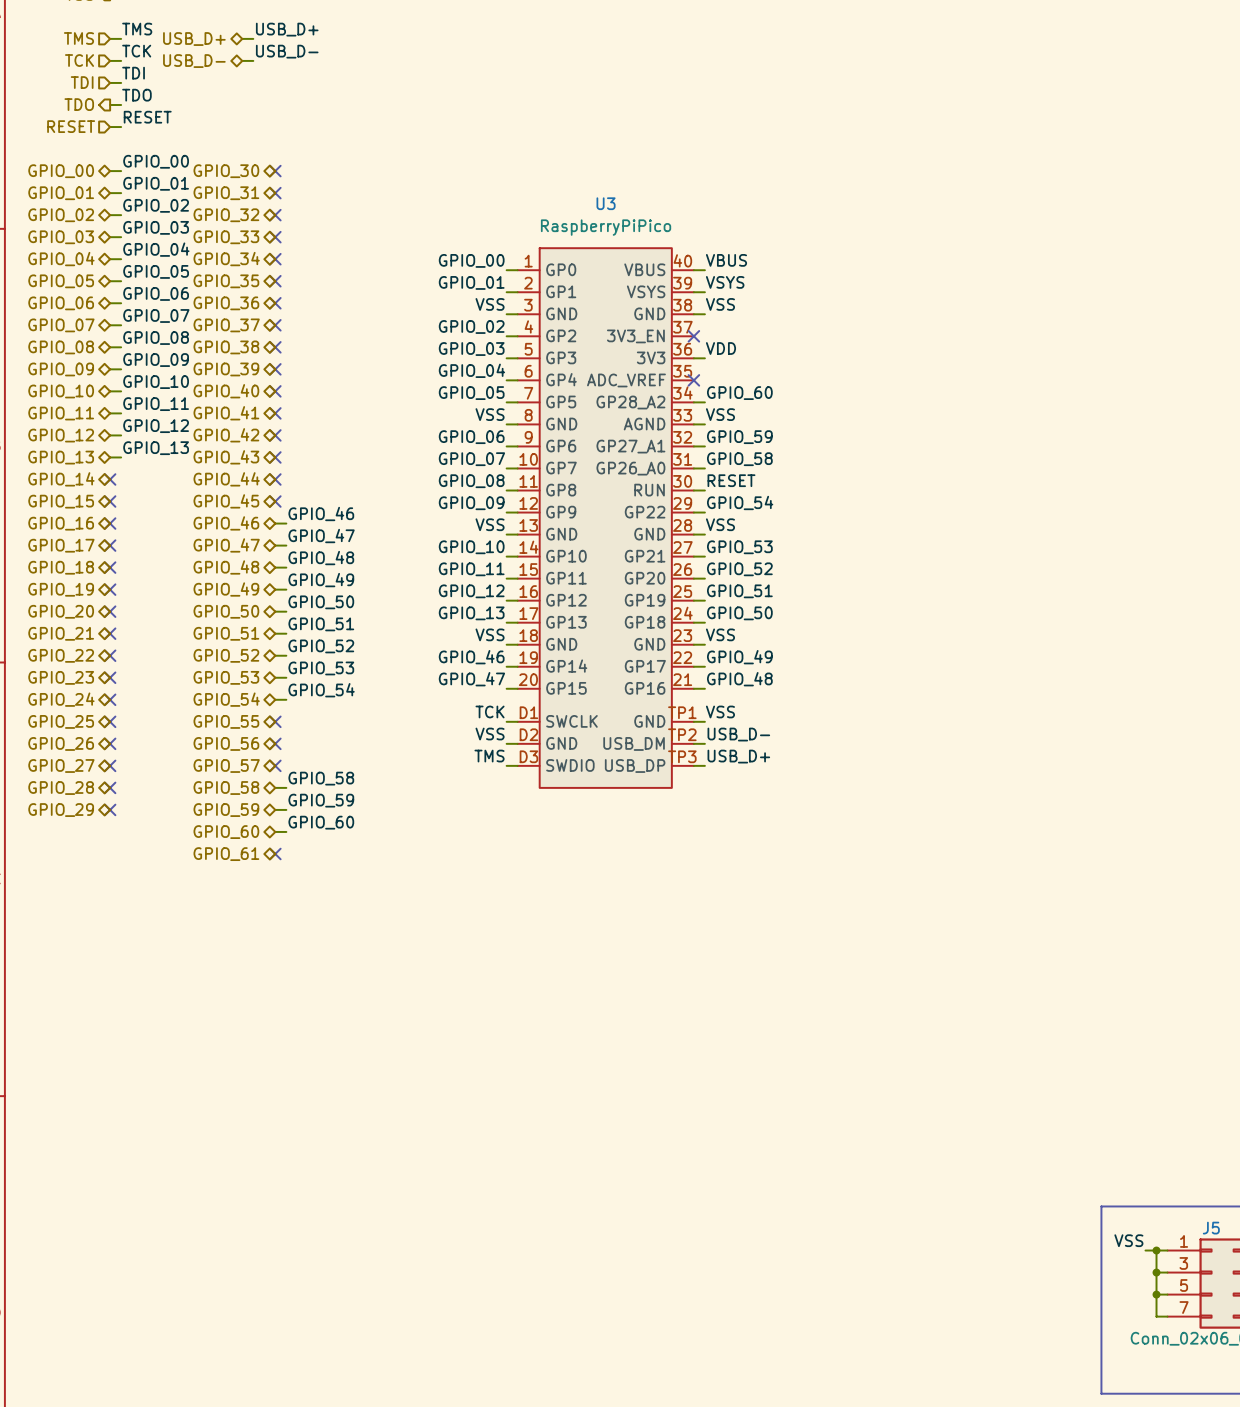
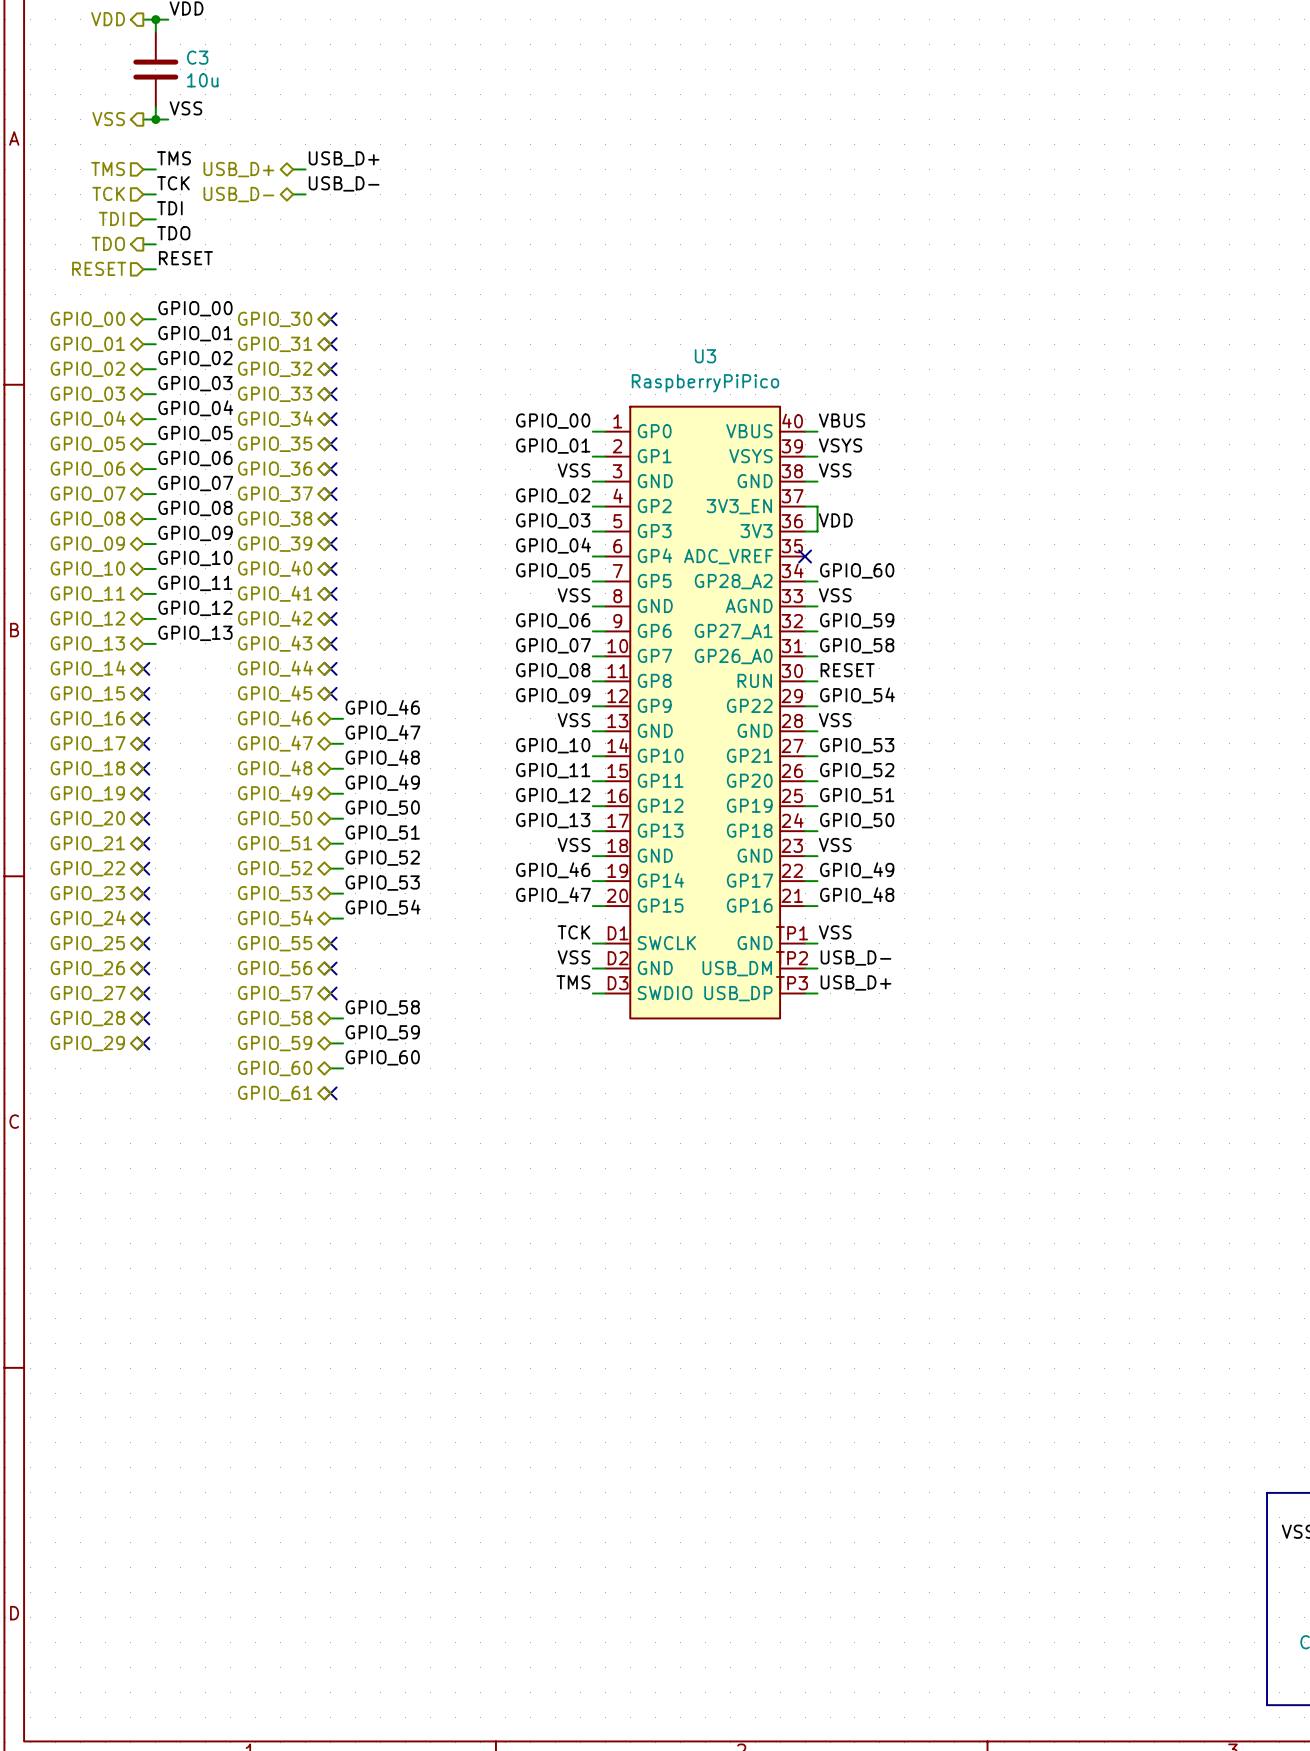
wire: none -> (805, 506) (817, 506) (817, 531)
no-connect mark: (693, 336) -> none

